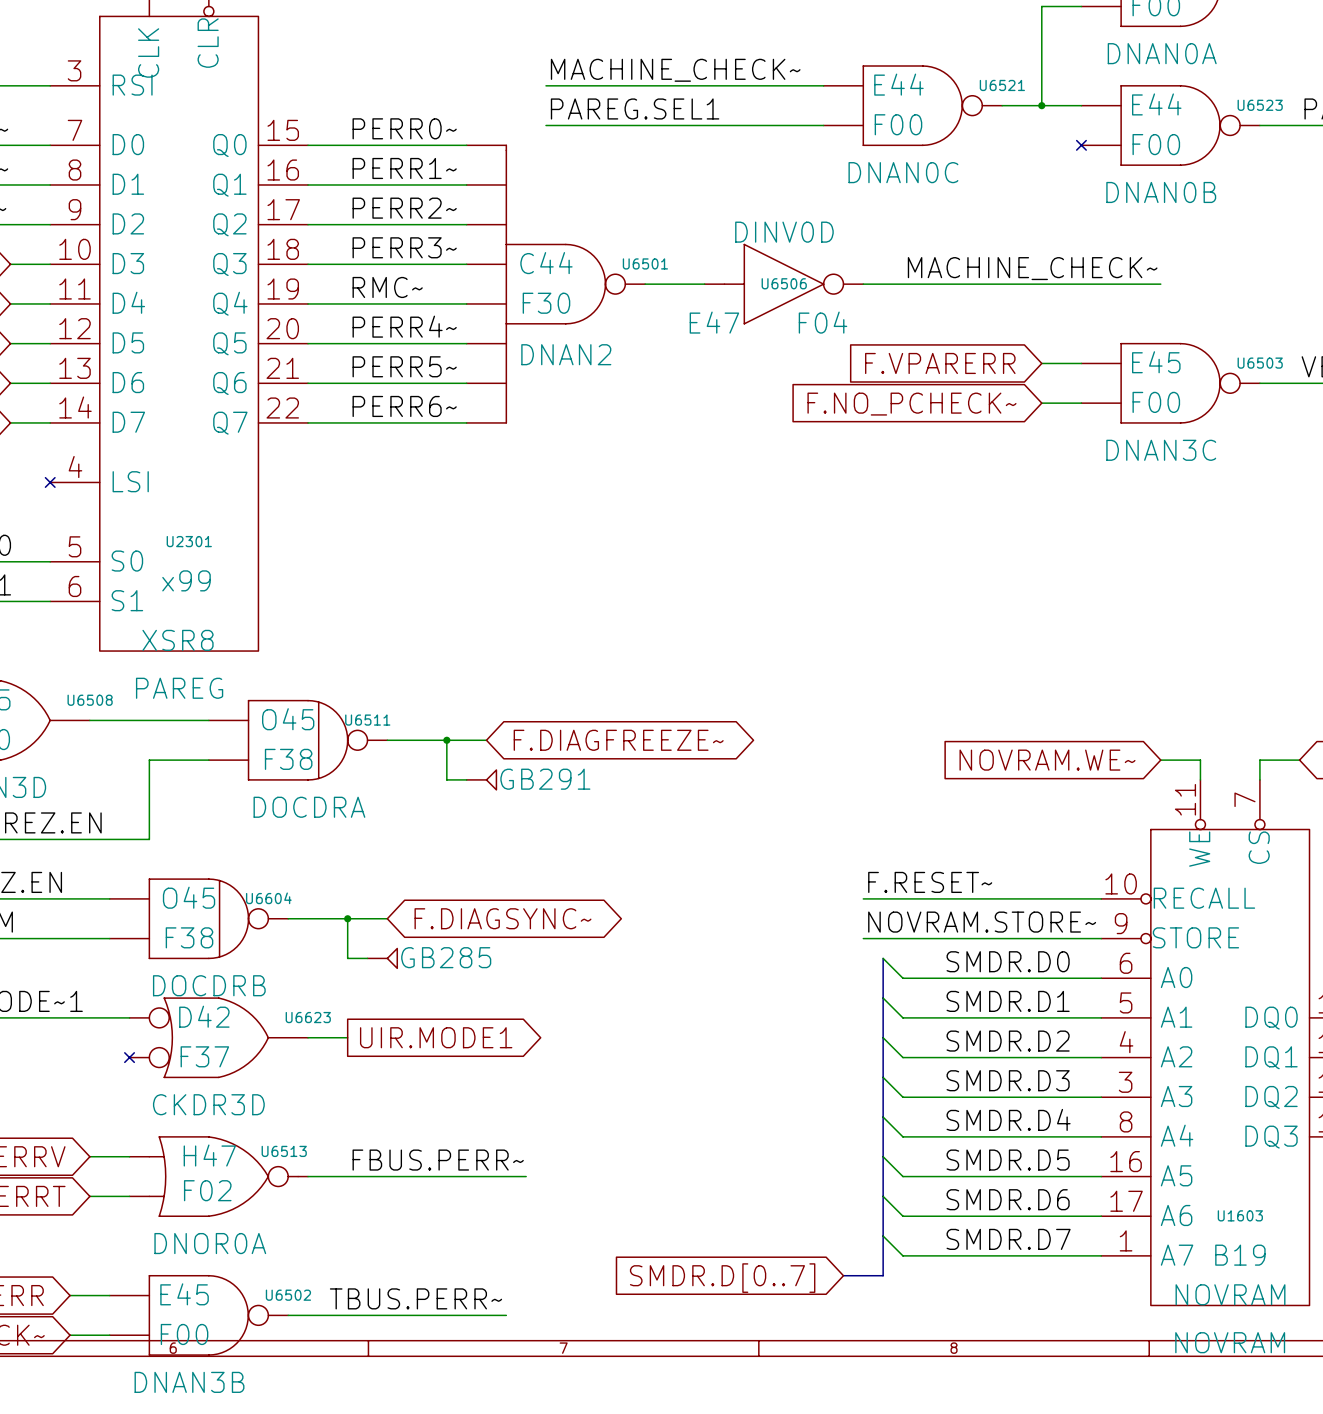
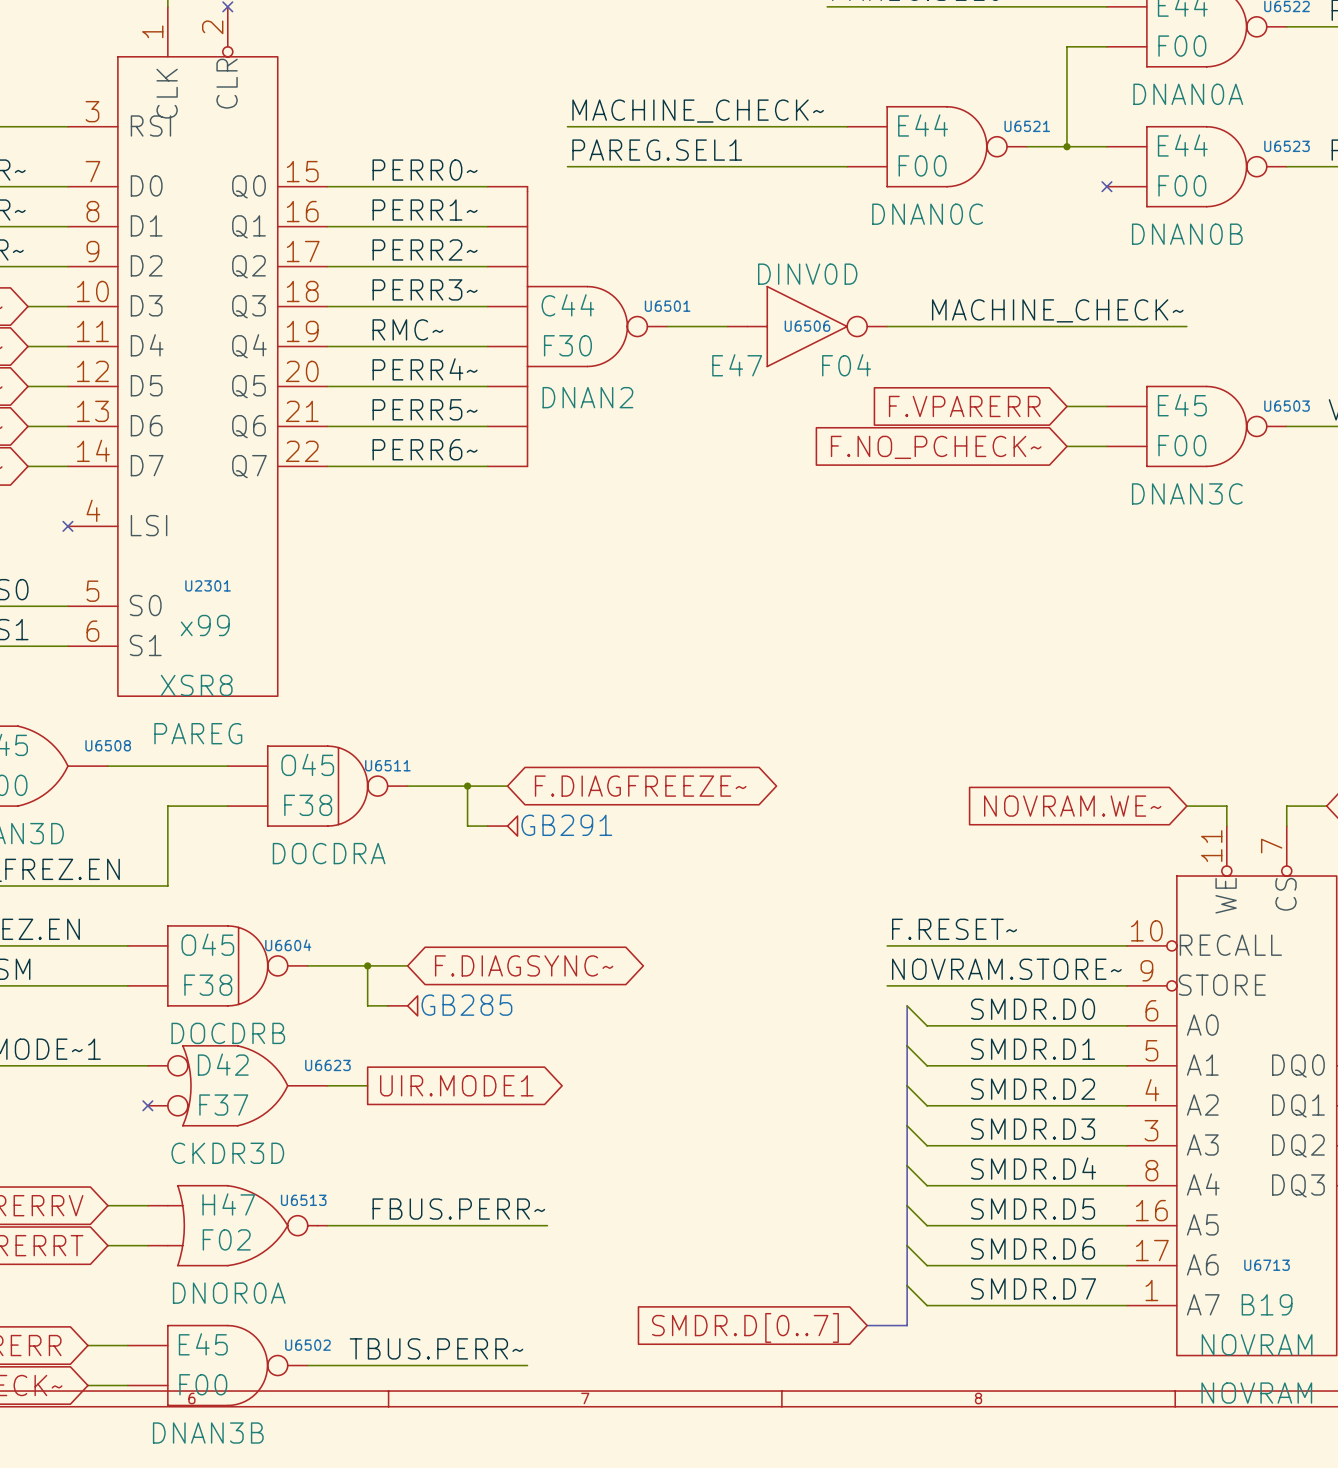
U1603 name: U1603 (1240, 1215) -> U6713 (1267, 1265)

